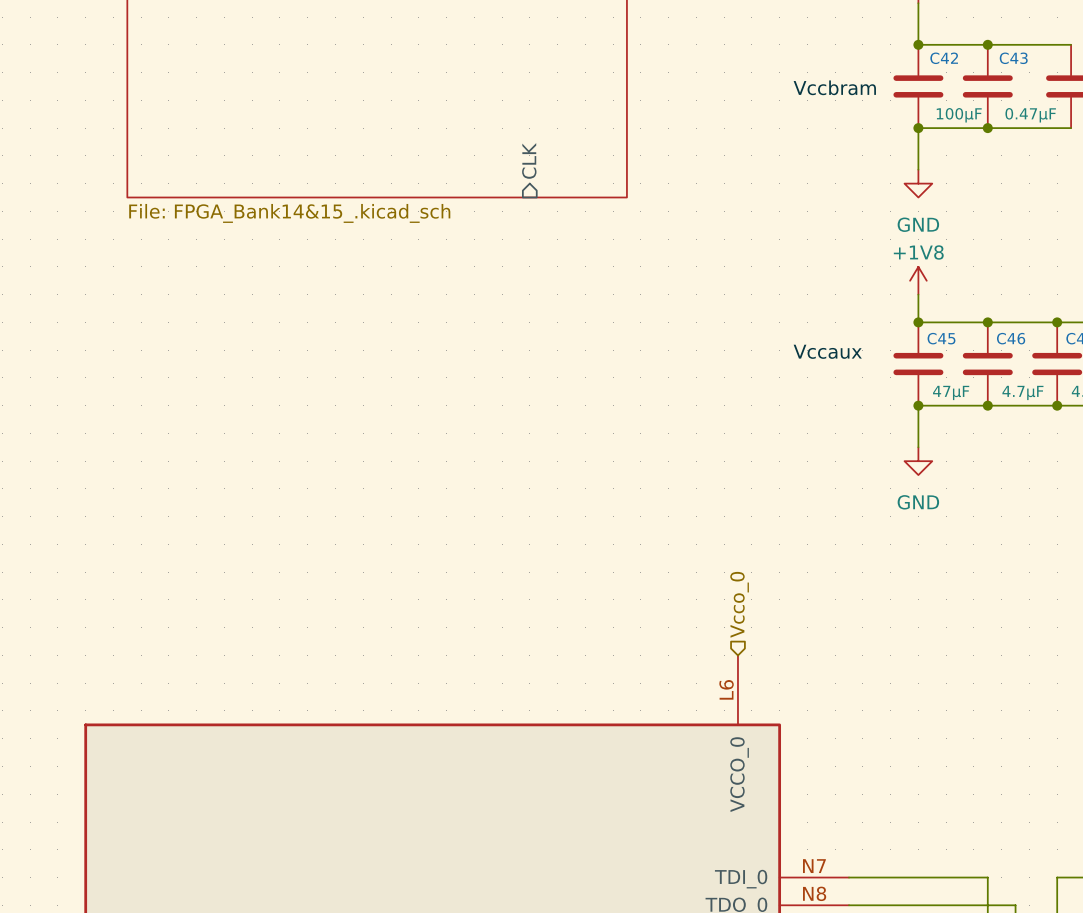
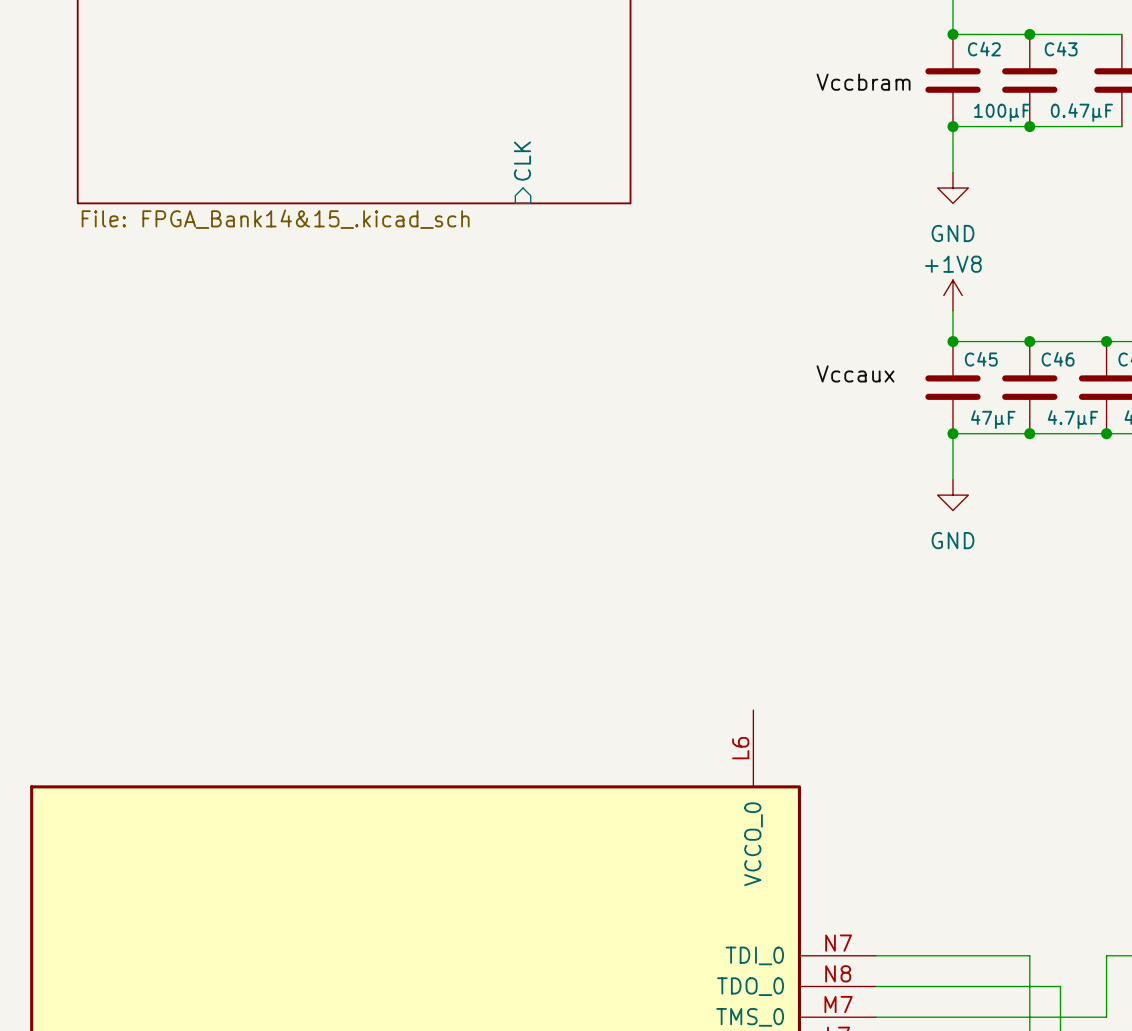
hierarchical label: Vcco_0 (739, 604) -> none

